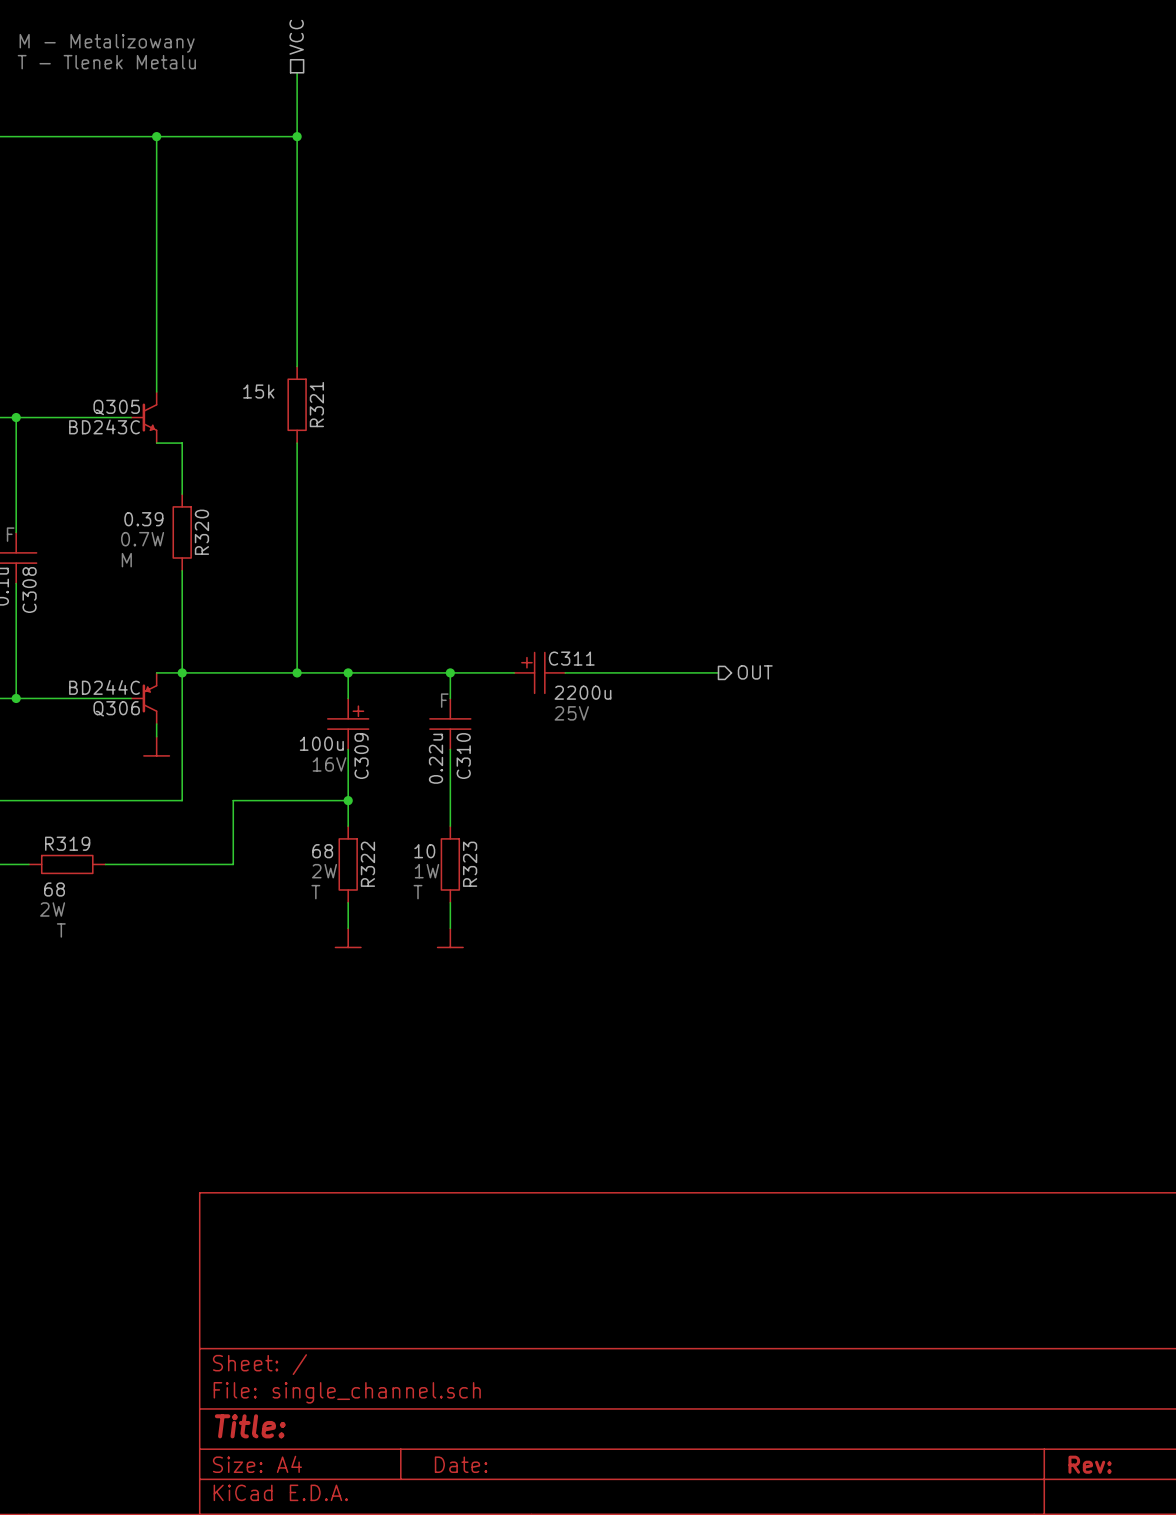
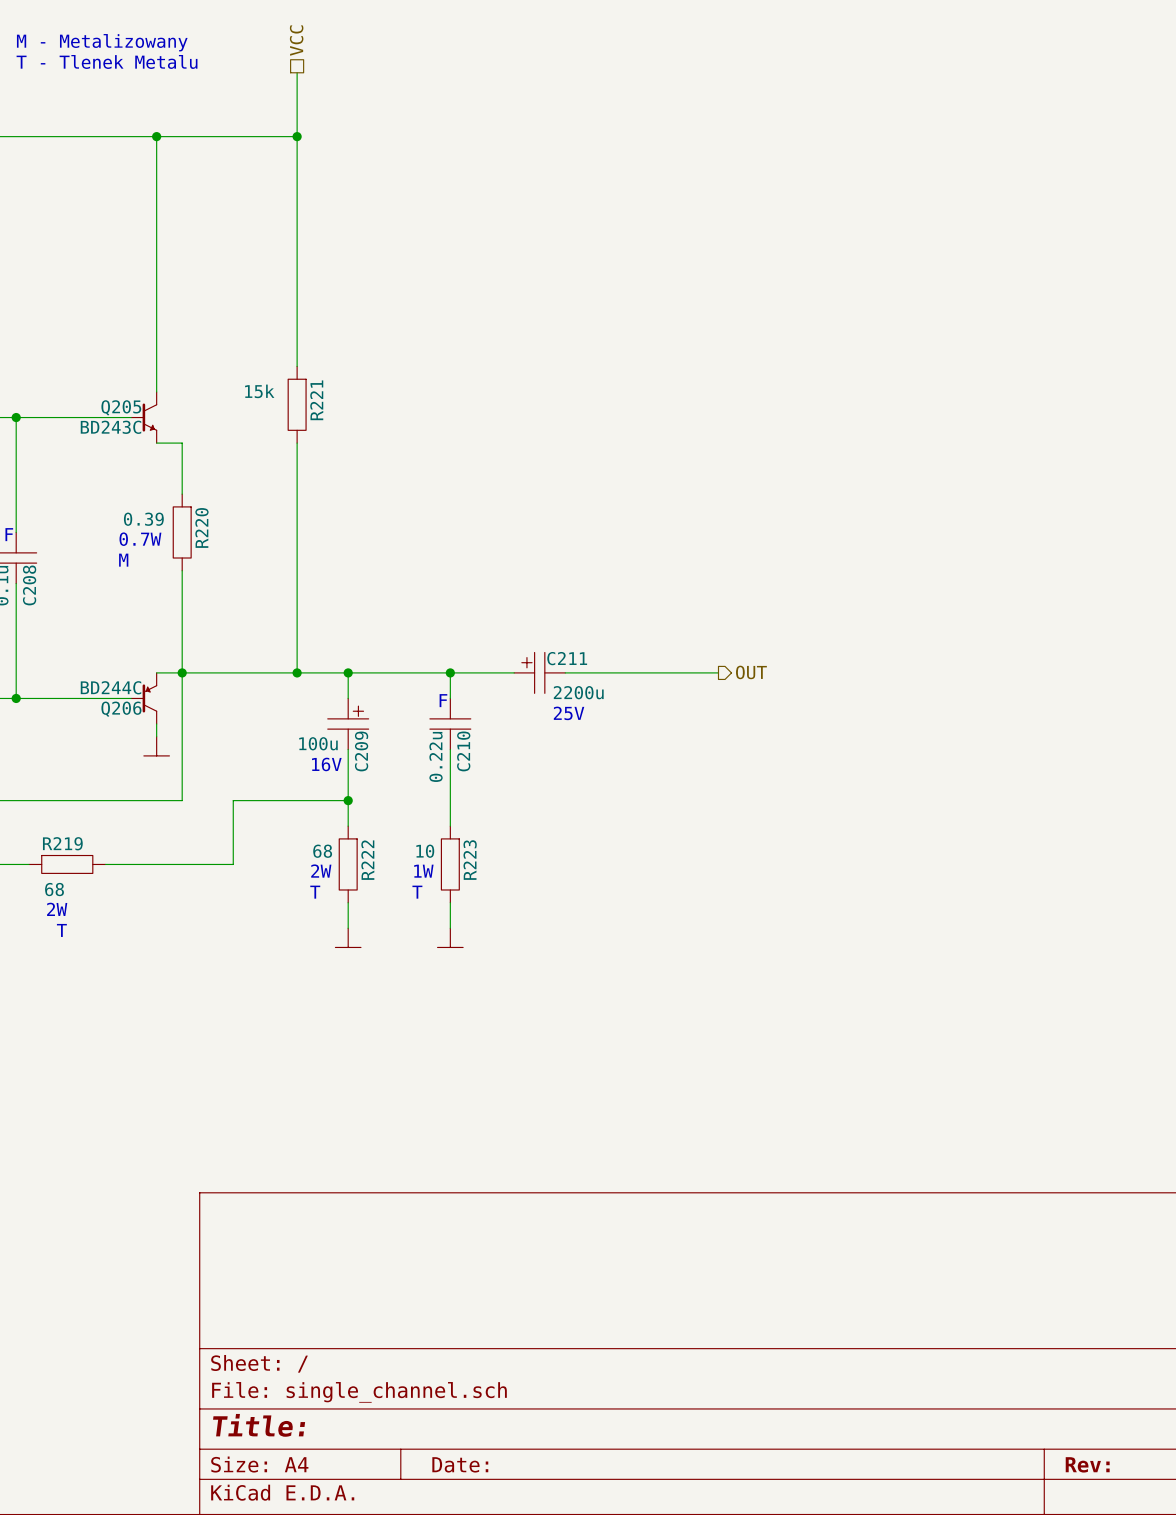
R321 name: R321 (316, 404) -> R221 (316, 400)
Q305 name: Q305 (116, 407) -> Q205 (121, 407)
R320 name: R320 (201, 532) -> R220 (201, 527)
C308 name: C308 (29, 590) -> C208 (29, 585)
C311 name: C311 (571, 658) -> C211 (567, 658)
Q306 name: Q306 (116, 708) -> Q206 (121, 709)
C309 name: C309 (361, 756) -> C209 (361, 751)
C310 name: C310 (463, 756) -> C210 (463, 751)
R319 name: R319 (67, 843) -> R219 (62, 843)
R322 name: R322 (367, 864) -> R222 (367, 860)
R323 name: R323 (470, 864) -> R223 (470, 860)

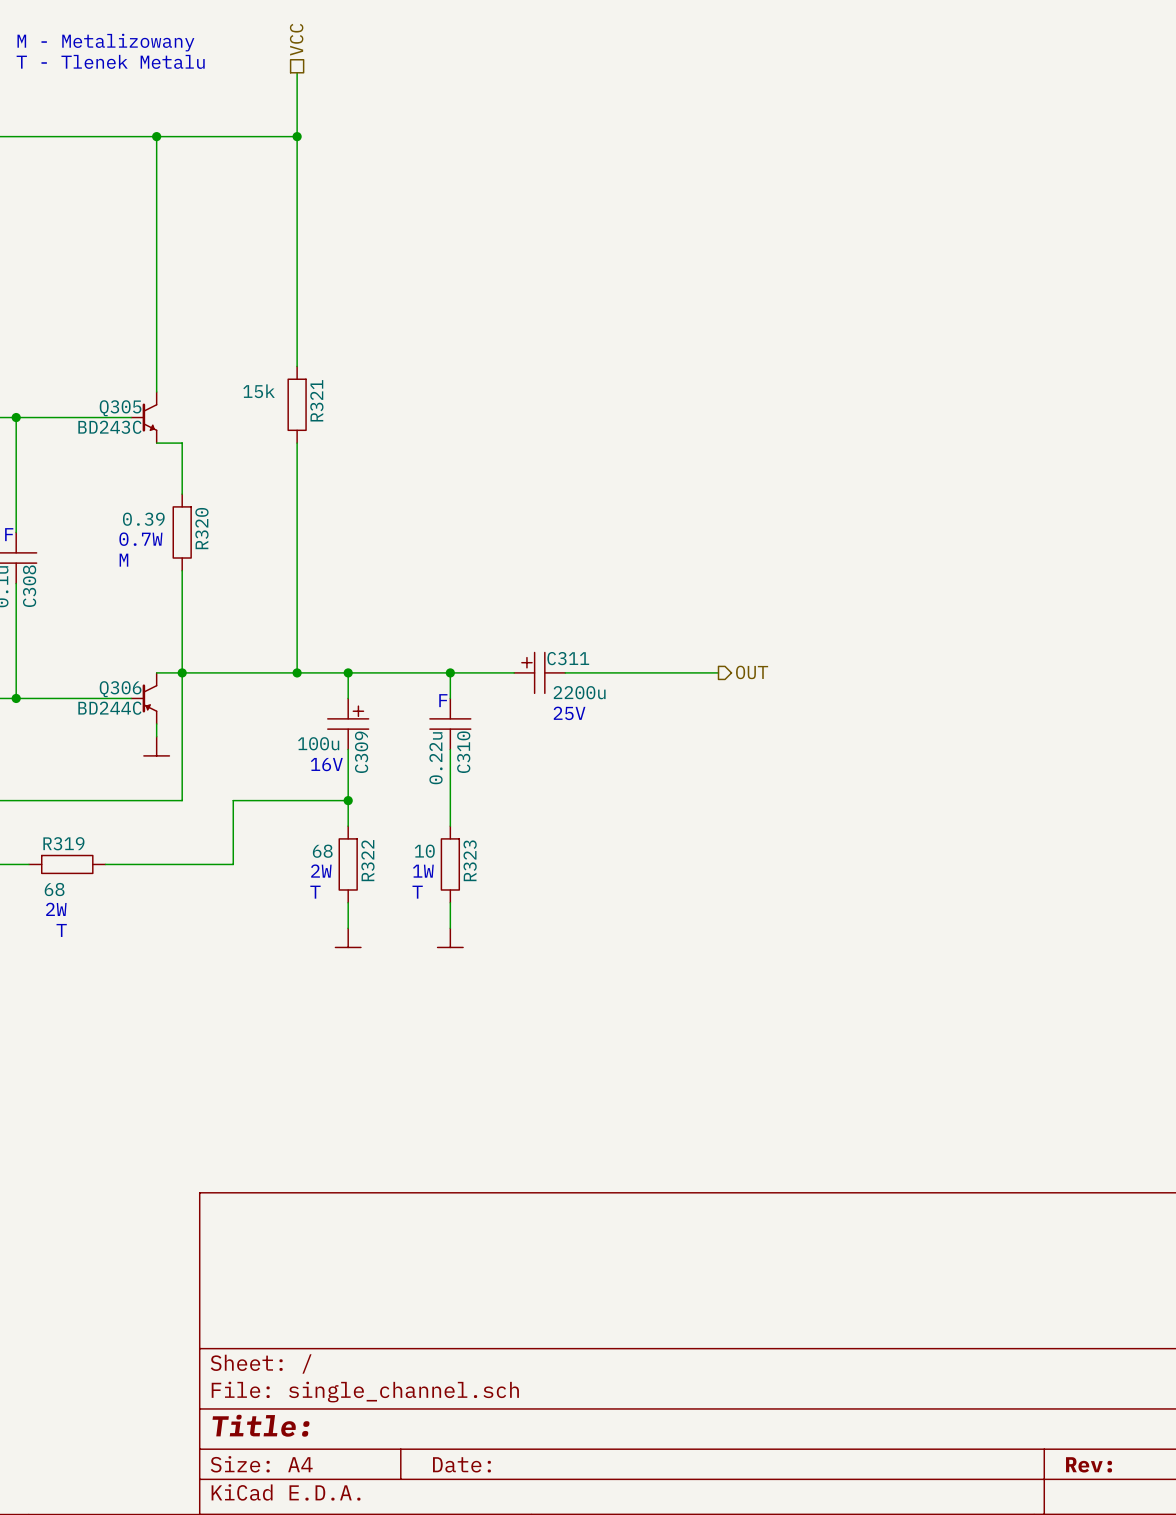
R221 name: R221 (316, 400) -> R321 (316, 400)
Q205 name: Q205 (121, 407) -> Q305 (120, 408)
R220 name: R220 (201, 527) -> R320 (201, 528)
C208 name: C208 (29, 585) -> C308 (29, 586)
C211 name: C211 (567, 658) -> C311 (568, 658)
Q206: BD244C (143, 698) -> none
Q306: none -> BD244C (143, 698)
C209 name: C209 (361, 751) -> C309 (361, 752)
C210 name: C210 (463, 751) -> C310 (463, 752)
R219 name: R219 (62, 843) -> R319 (63, 843)
R222 name: R222 (367, 860) -> R322 (367, 860)
R223 name: R223 (470, 860) -> R323 (470, 860)

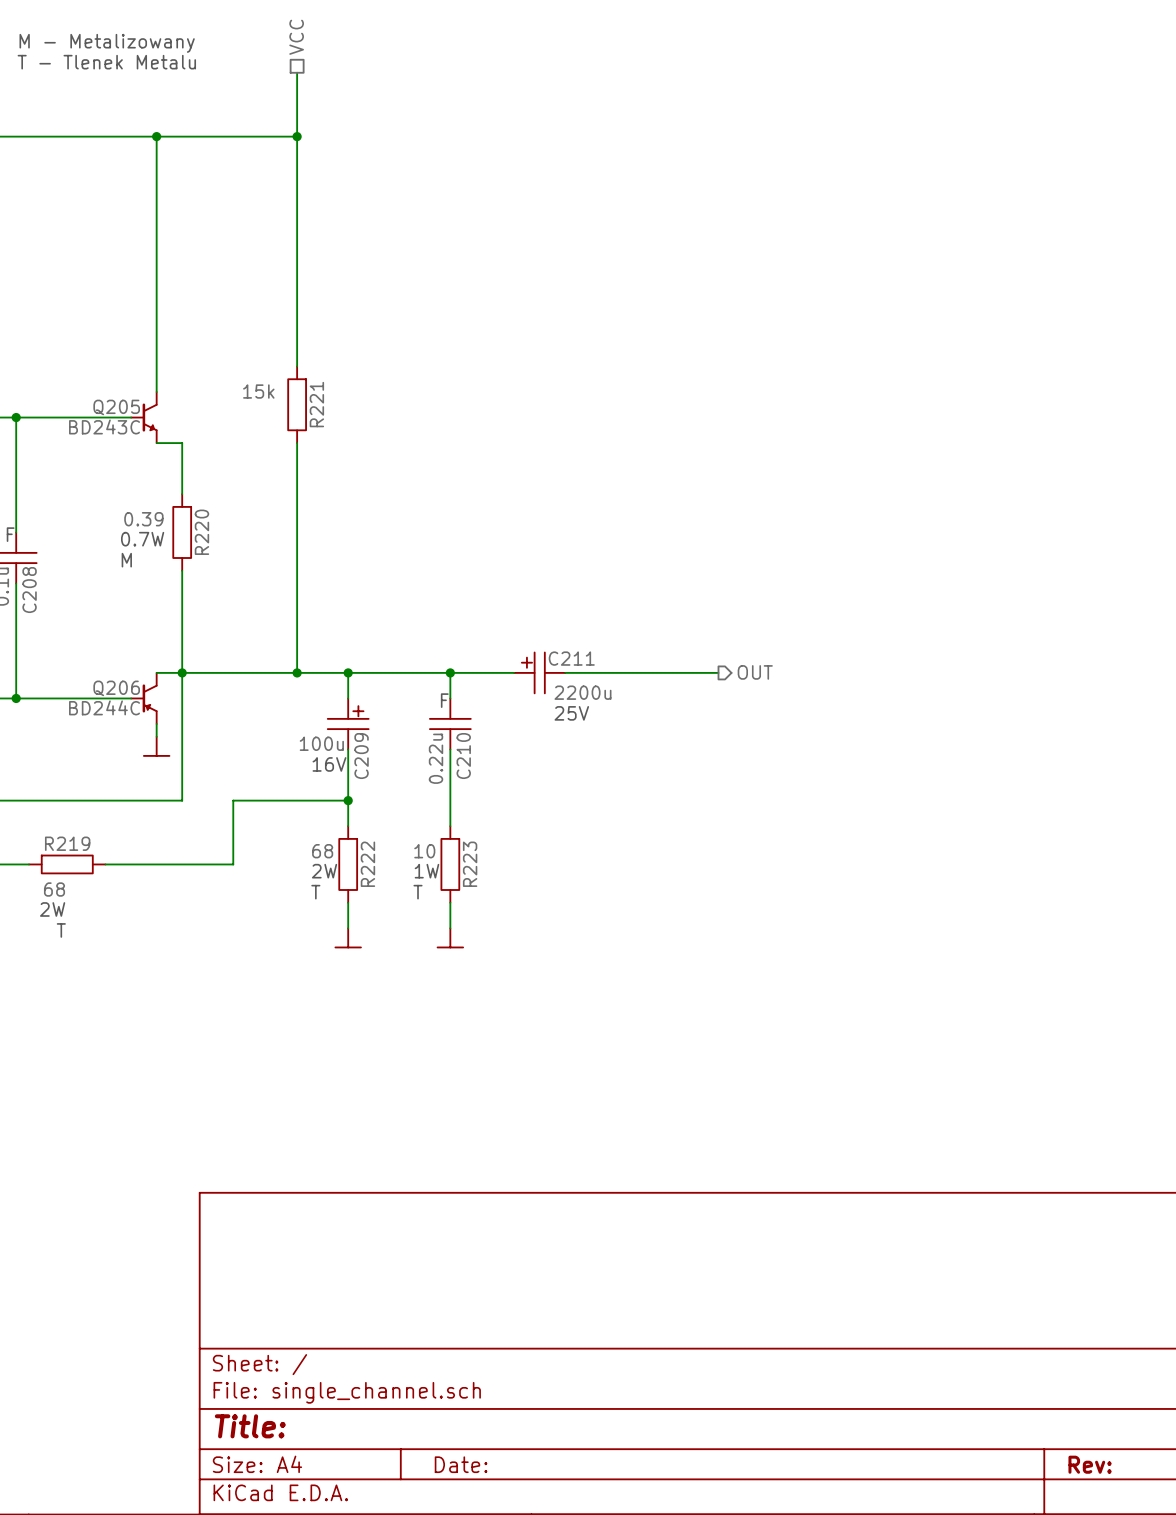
R321 name: R321 (316, 400) -> R221 (316, 404)
Q305 name: Q305 (120, 408) -> Q205 (116, 407)
R320 name: R320 (201, 528) -> R220 (201, 532)
C308 name: C308 (29, 586) -> C208 (29, 590)
C311 name: C311 (568, 658) -> C211 (571, 658)
Q306 name: Q306 (120, 689) -> Q206 (116, 688)
C309 name: C309 (361, 752) -> C209 (361, 756)
C310 name: C310 (463, 752) -> C210 (463, 756)
R319 name: R319 (63, 843) -> R219 (67, 843)
R322 name: R322 (367, 860) -> R222 (367, 864)
R323 name: R323 (470, 860) -> R223 (470, 864)

